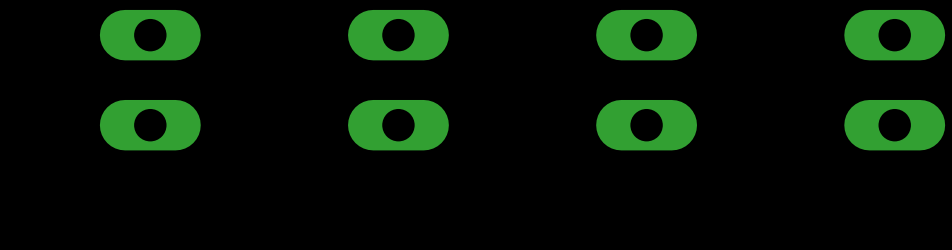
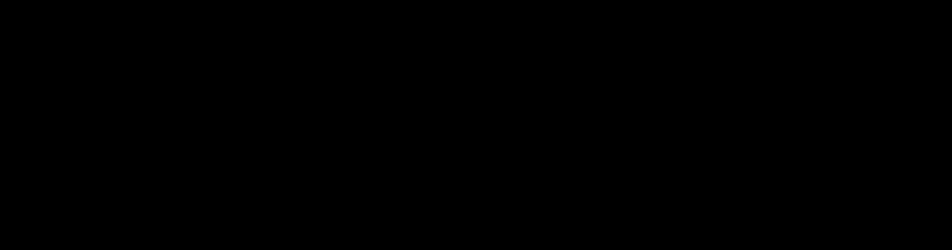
part: (150, 80) -> none
part: (398, 80) -> none
part: (646, 80) -> none
part: (894, 80) -> none

